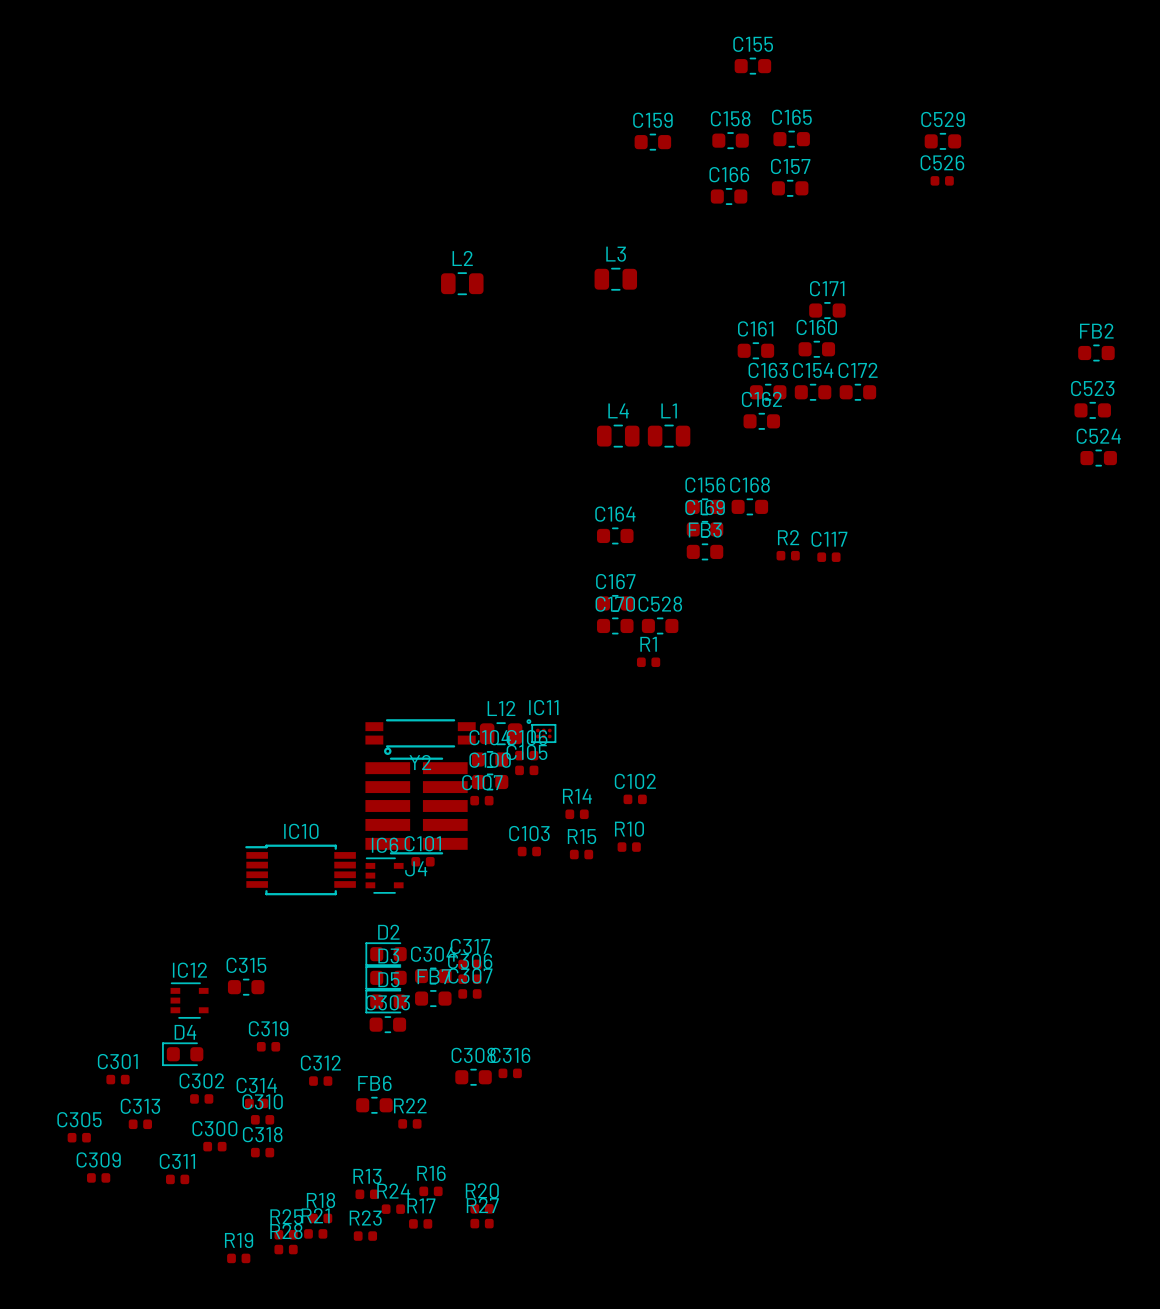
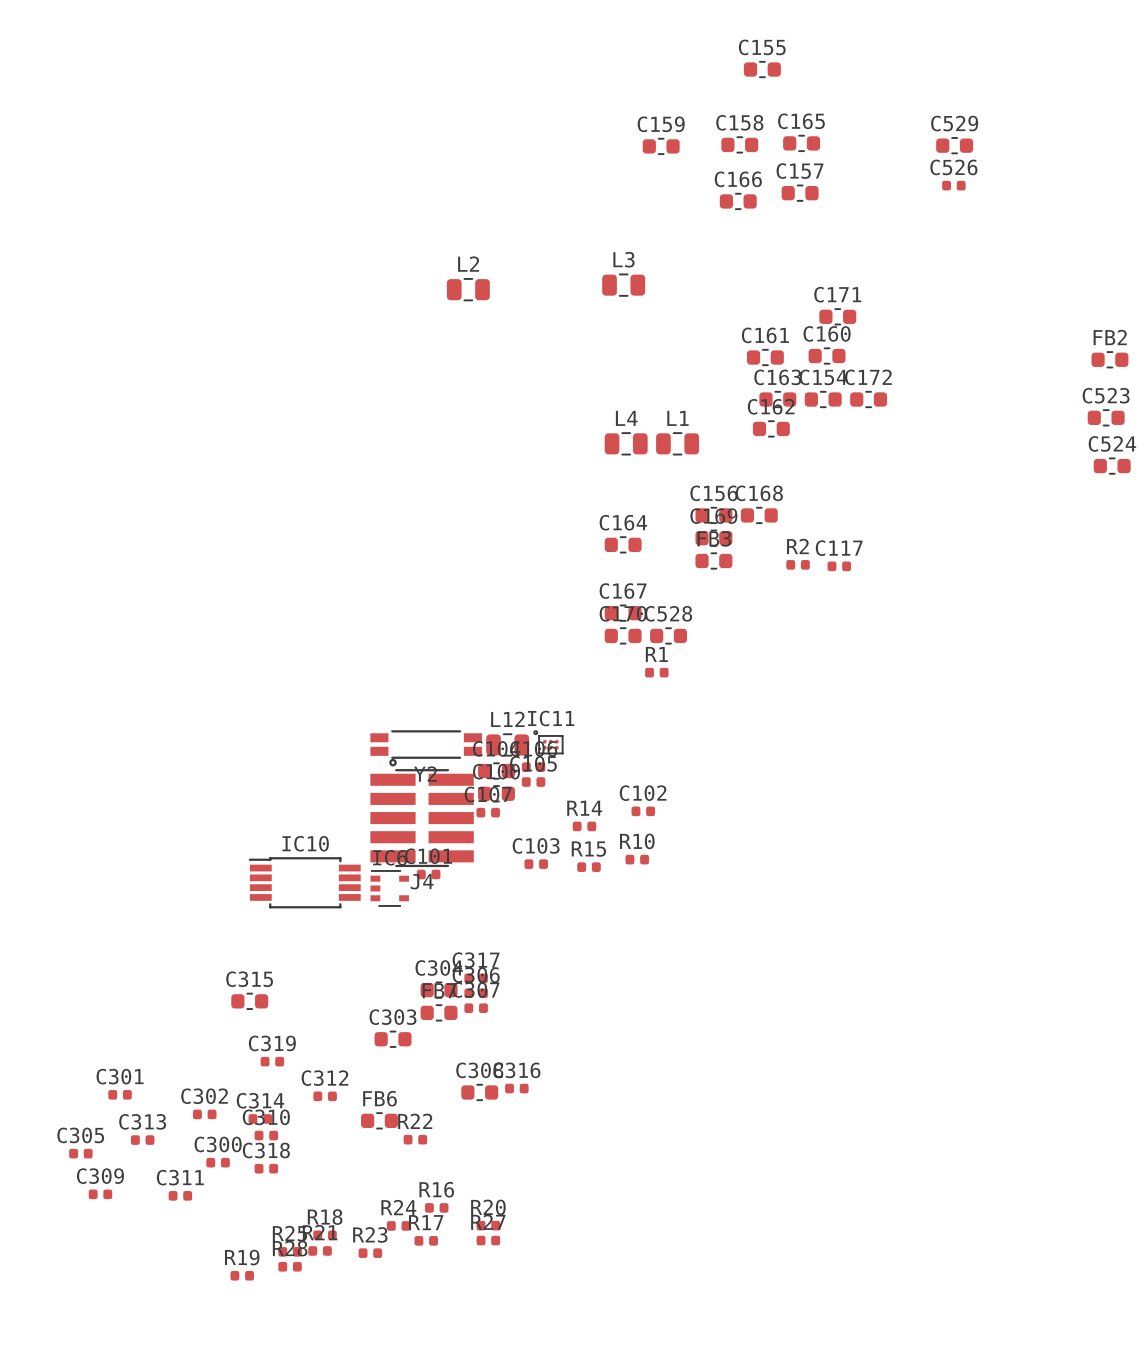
D2: (386, 954) -> none
D3: (386, 977) -> none
IC12: (189, 1000) -> none
D5: (386, 1001) -> none
D4: (182, 1054) -> none
R13: (367, 1194) -> none

